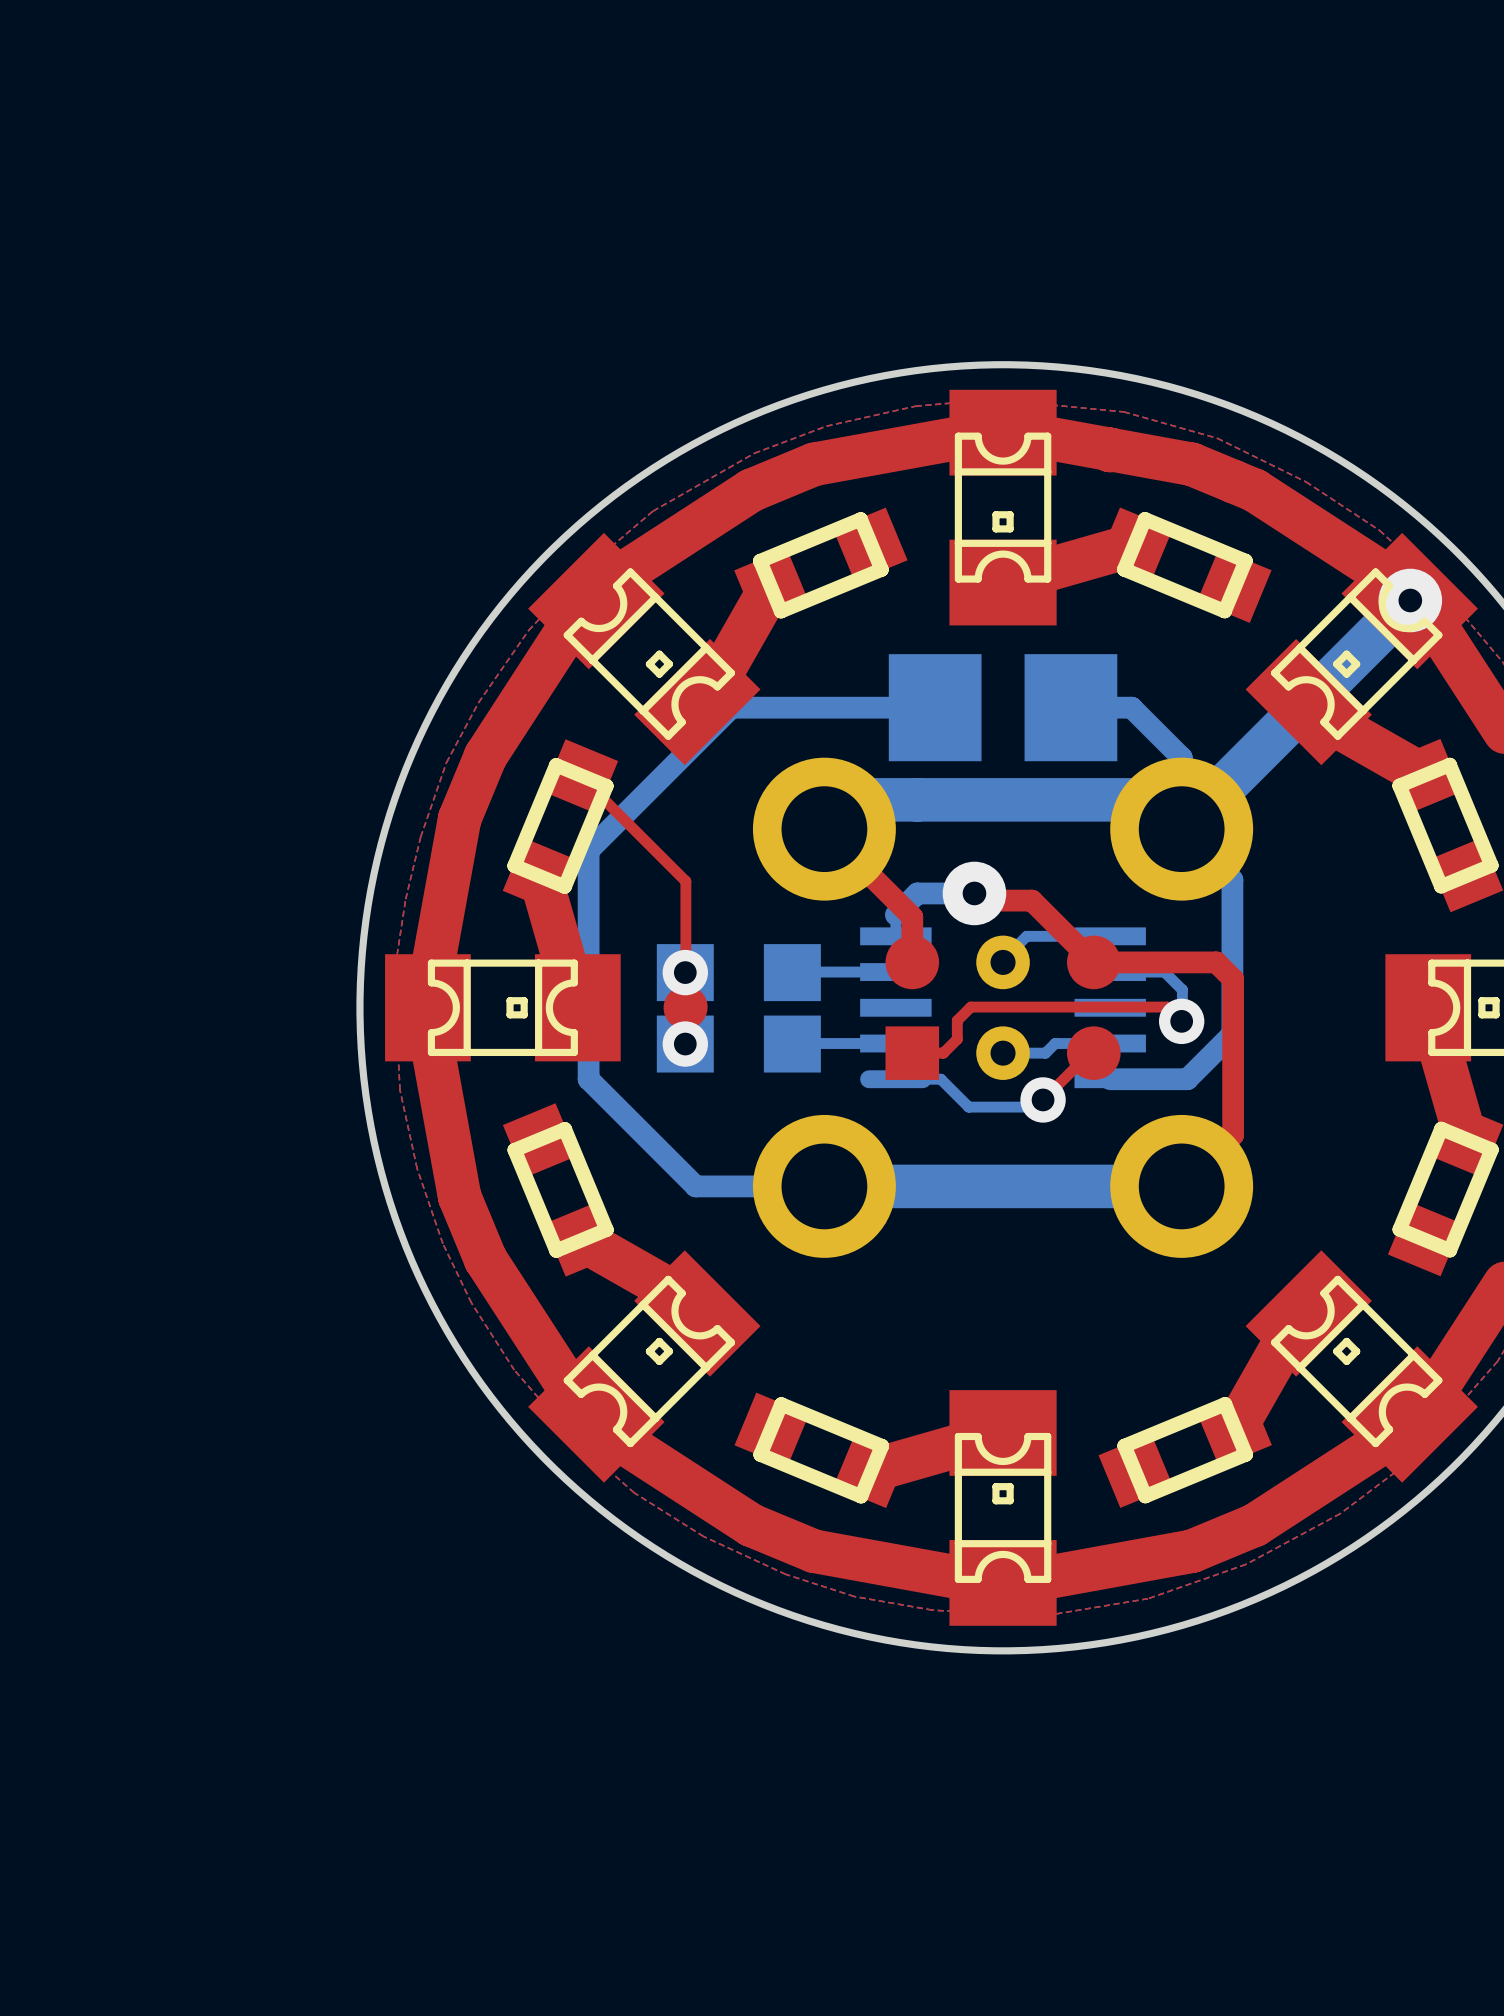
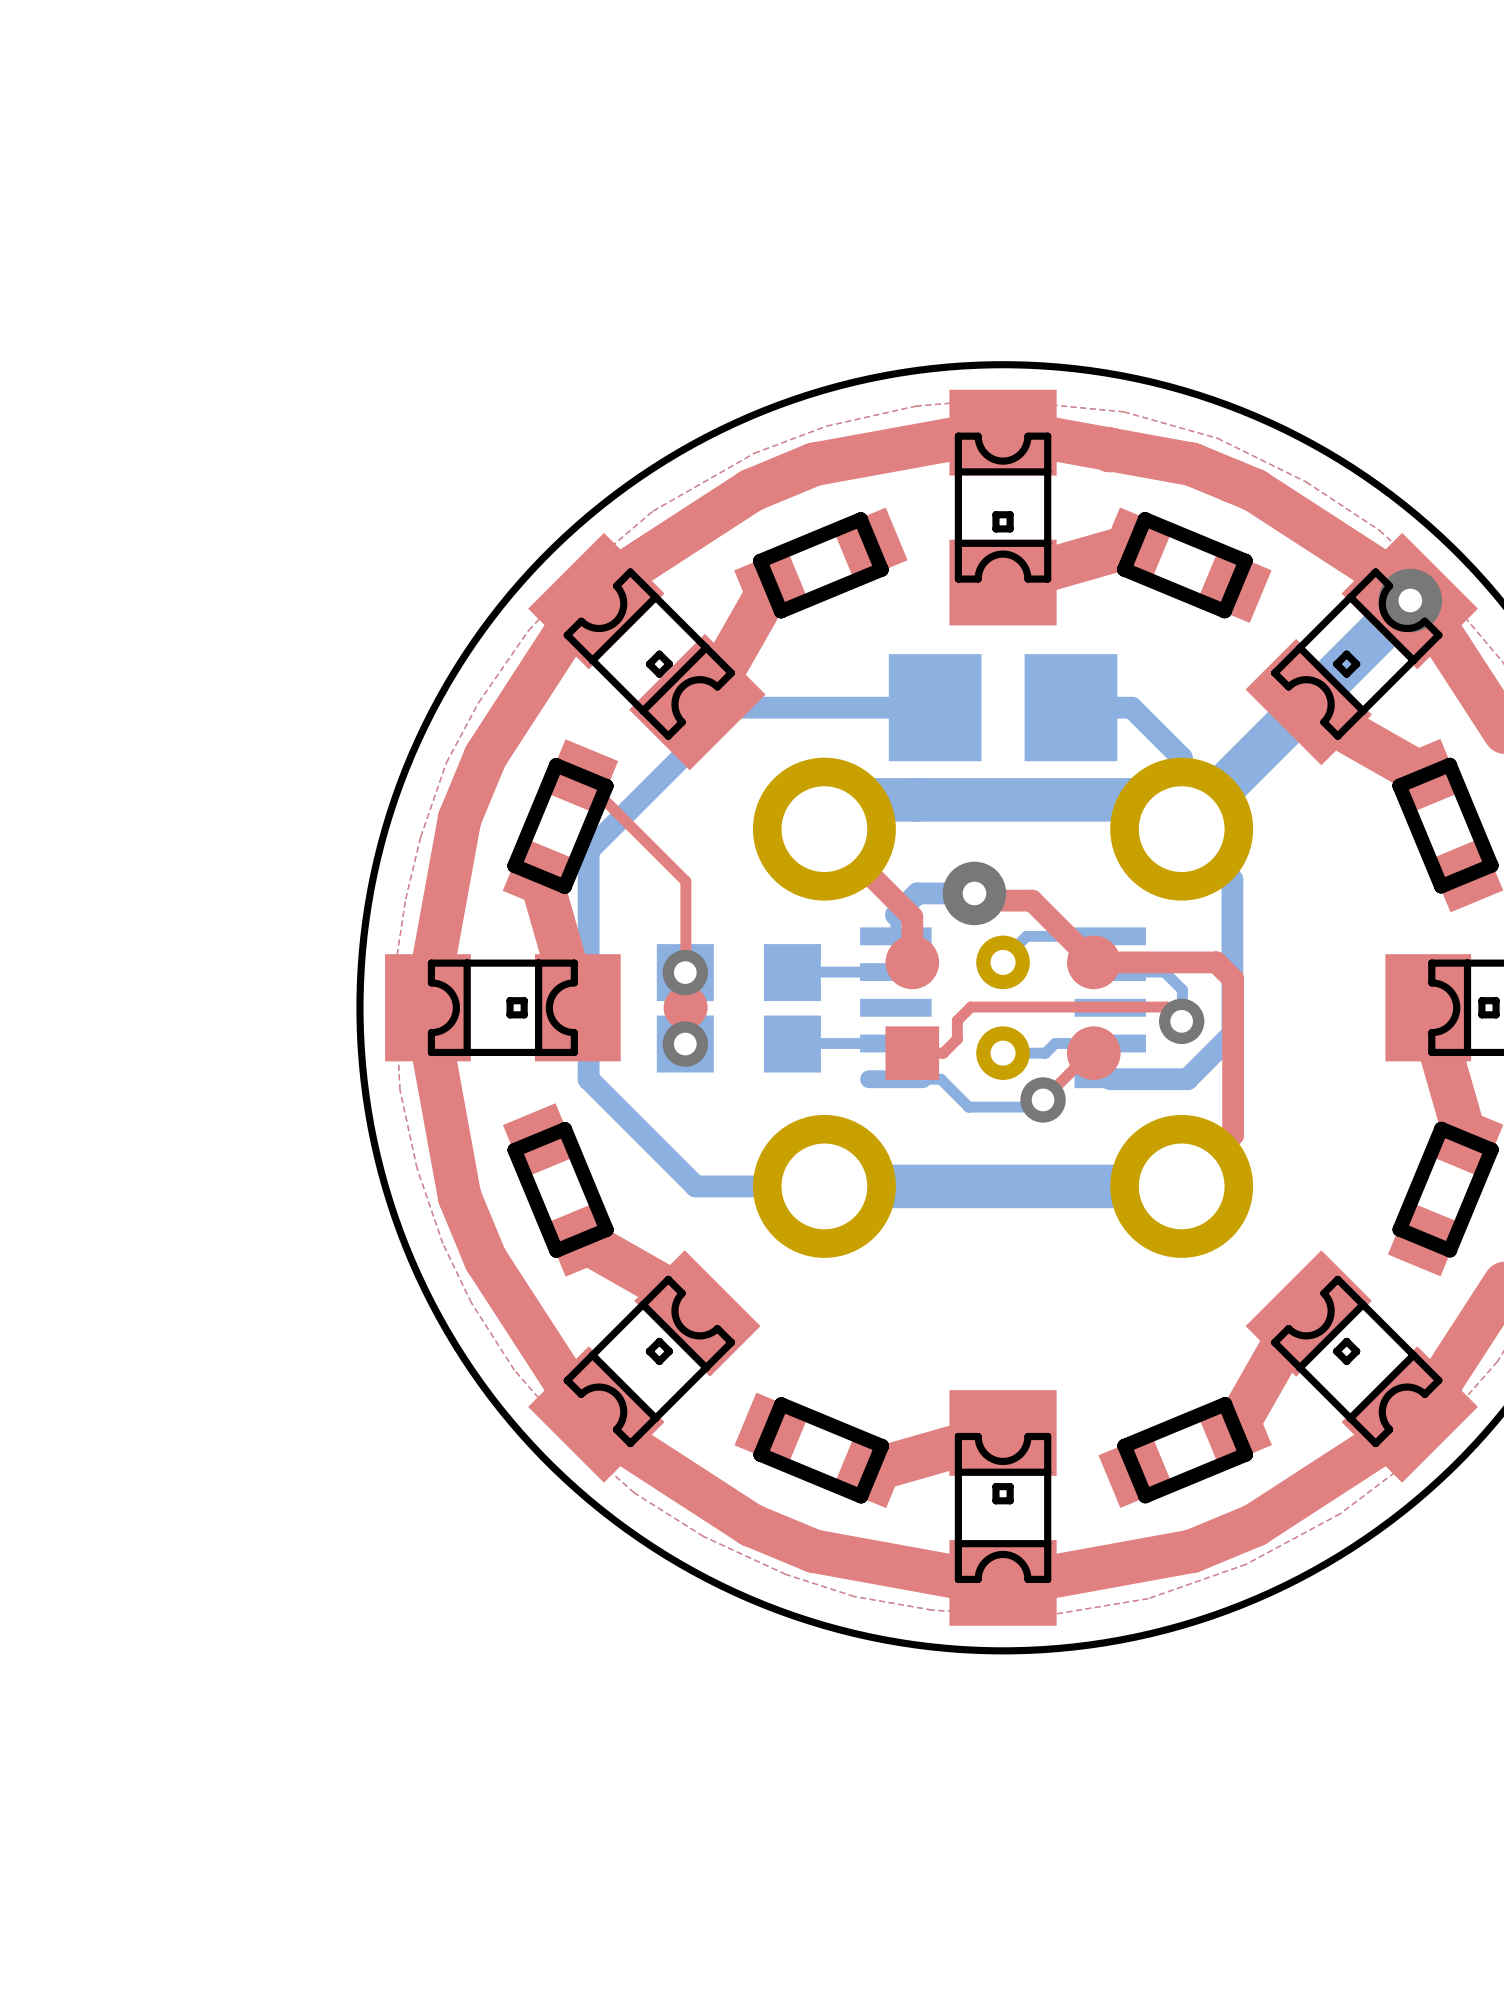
part footprint: [528, 532, 761, 766] -> [528, 532, 766, 771]

